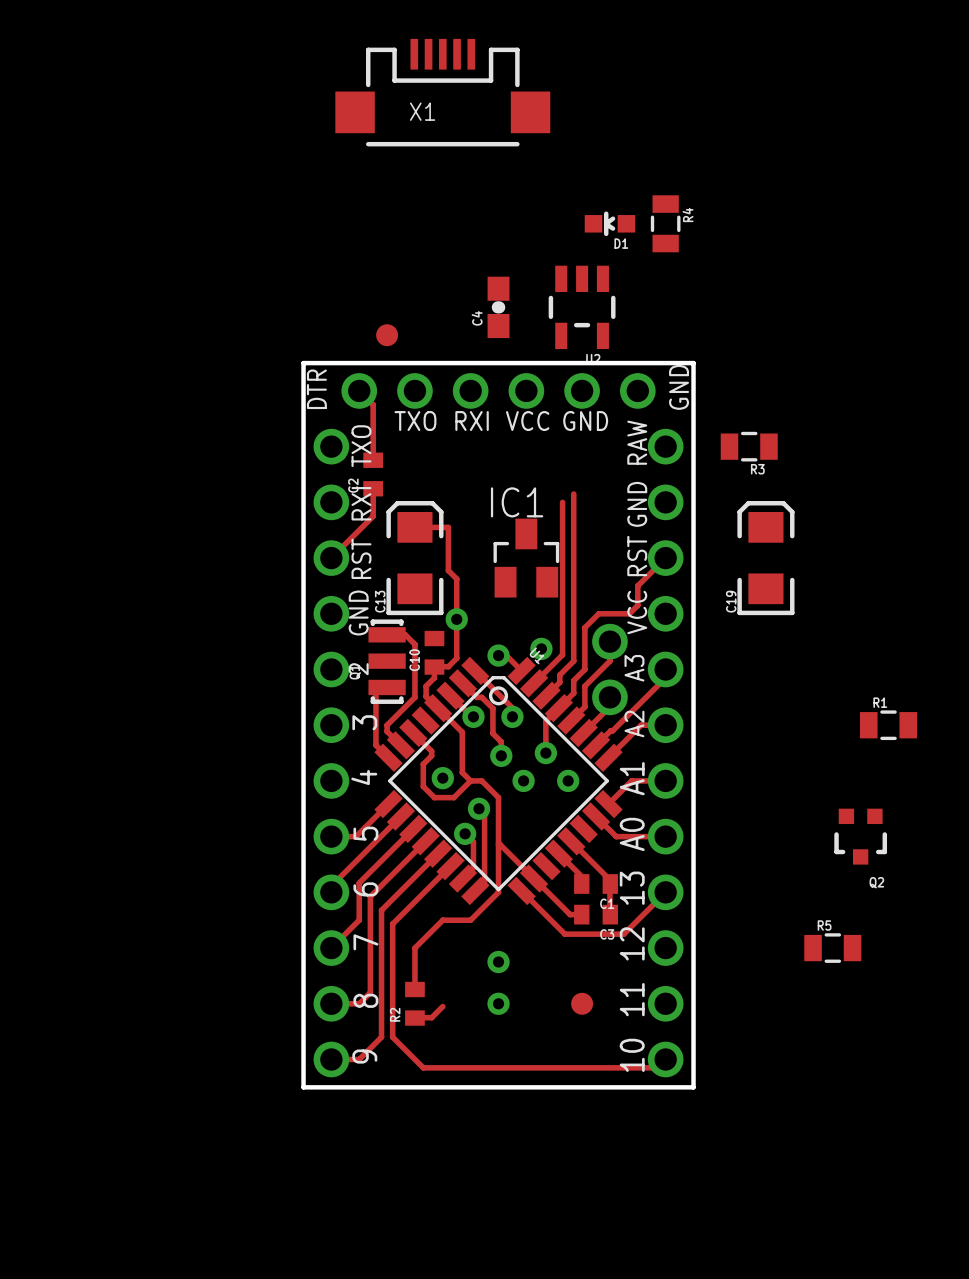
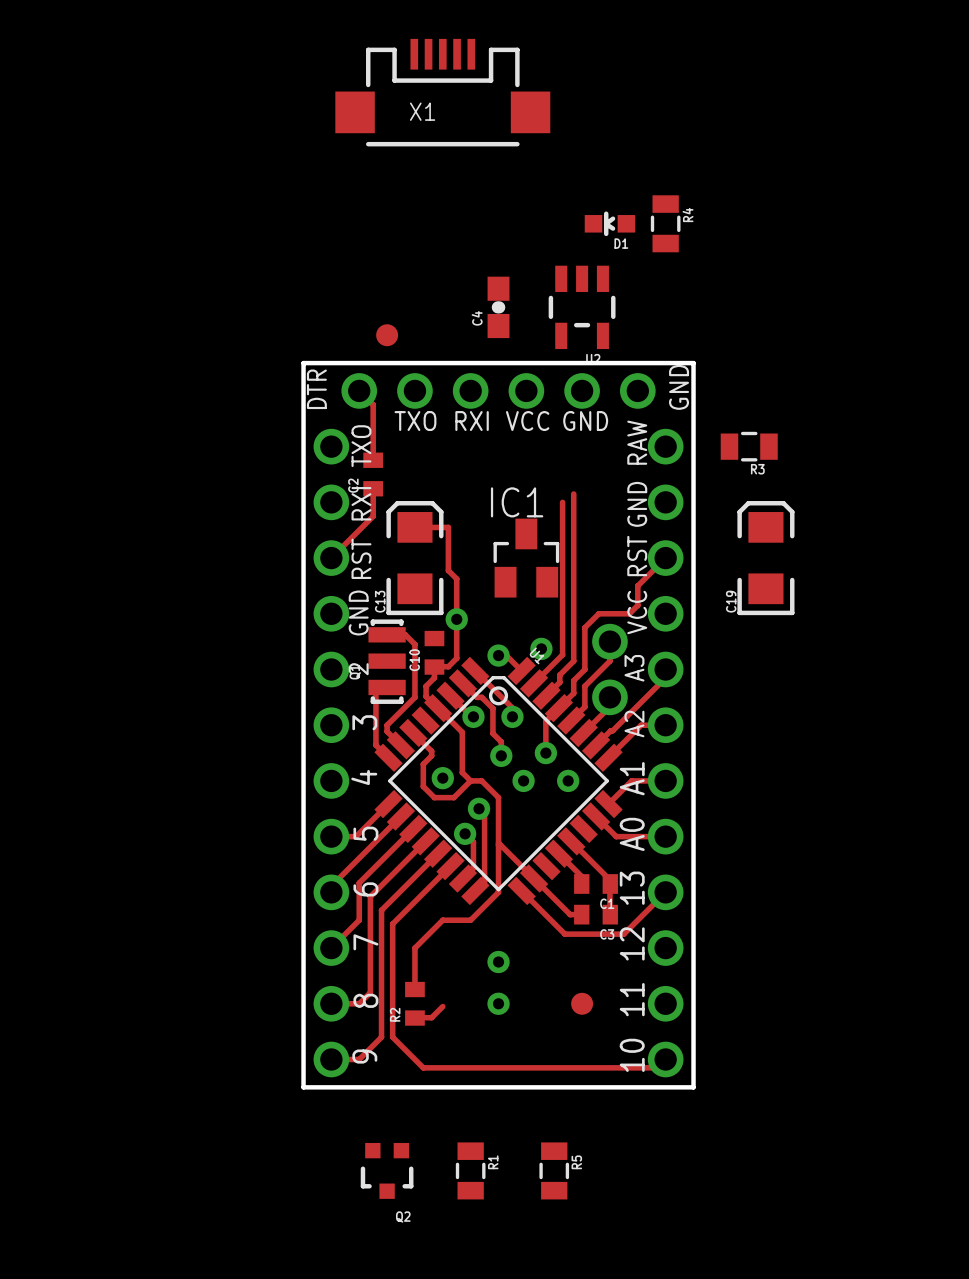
R1 rotation: 0° (888, 725) -> 90° clockwise (470, 1170)
R1 position: (888, 725) -> (470, 1170)
Q2 position: (860, 836) -> (387, 1170)
R5 rotation: 0° (832, 948) -> 90° clockwise (554, 1170)
R5 position: (832, 948) -> (554, 1170)

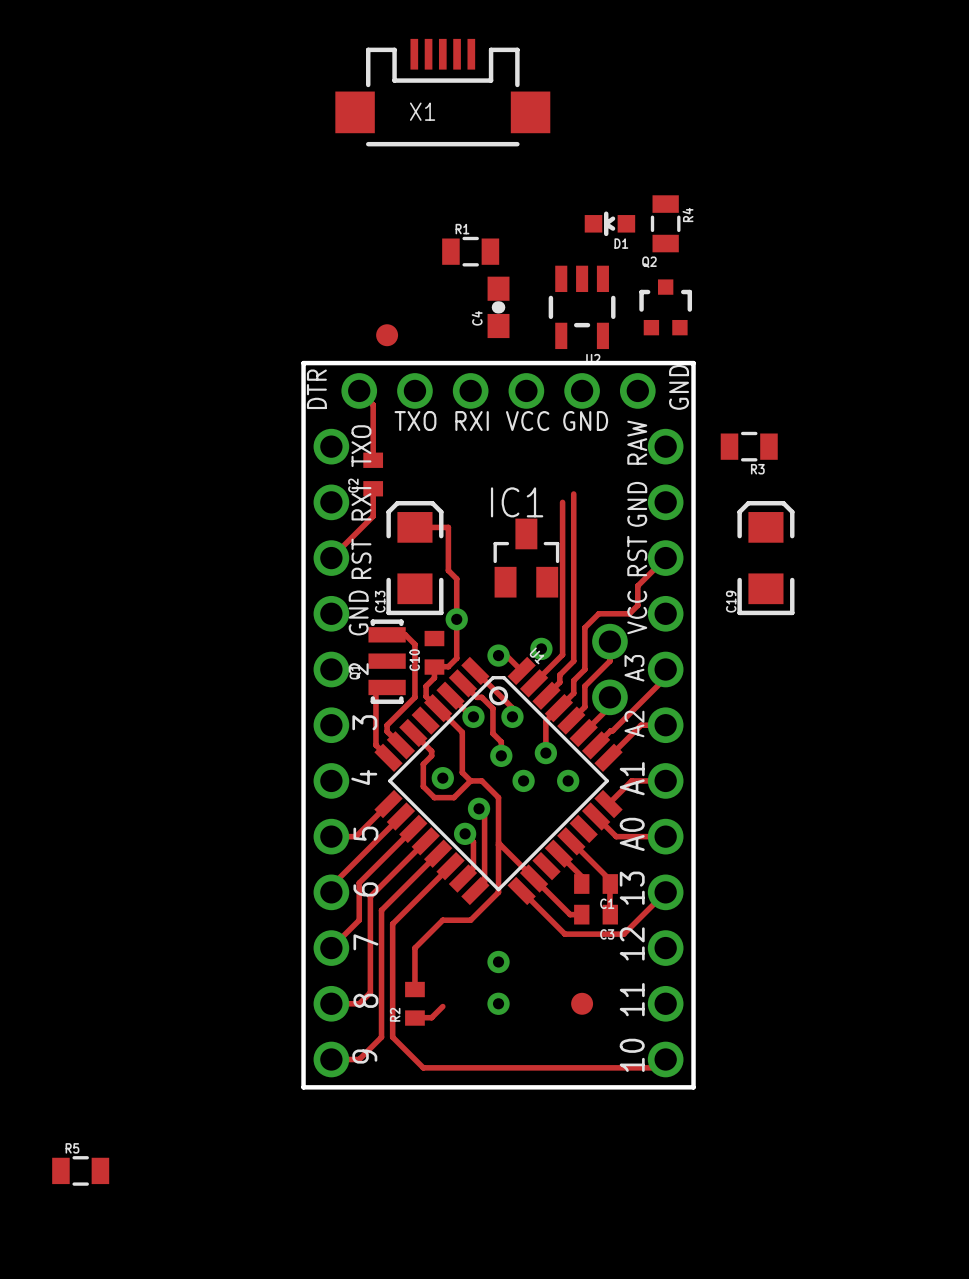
Q2 rotation: 0° (387, 1170) -> 180° (665, 307)
Q2 position: (387, 1170) -> (665, 307)
R1 rotation: 0° (470, 1170) -> 90° clockwise (470, 251)
R1 position: (470, 1170) -> (470, 251)
R5 rotation: 0° (554, 1170) -> 90° clockwise (80, 1170)
R5 position: (554, 1170) -> (80, 1170)

